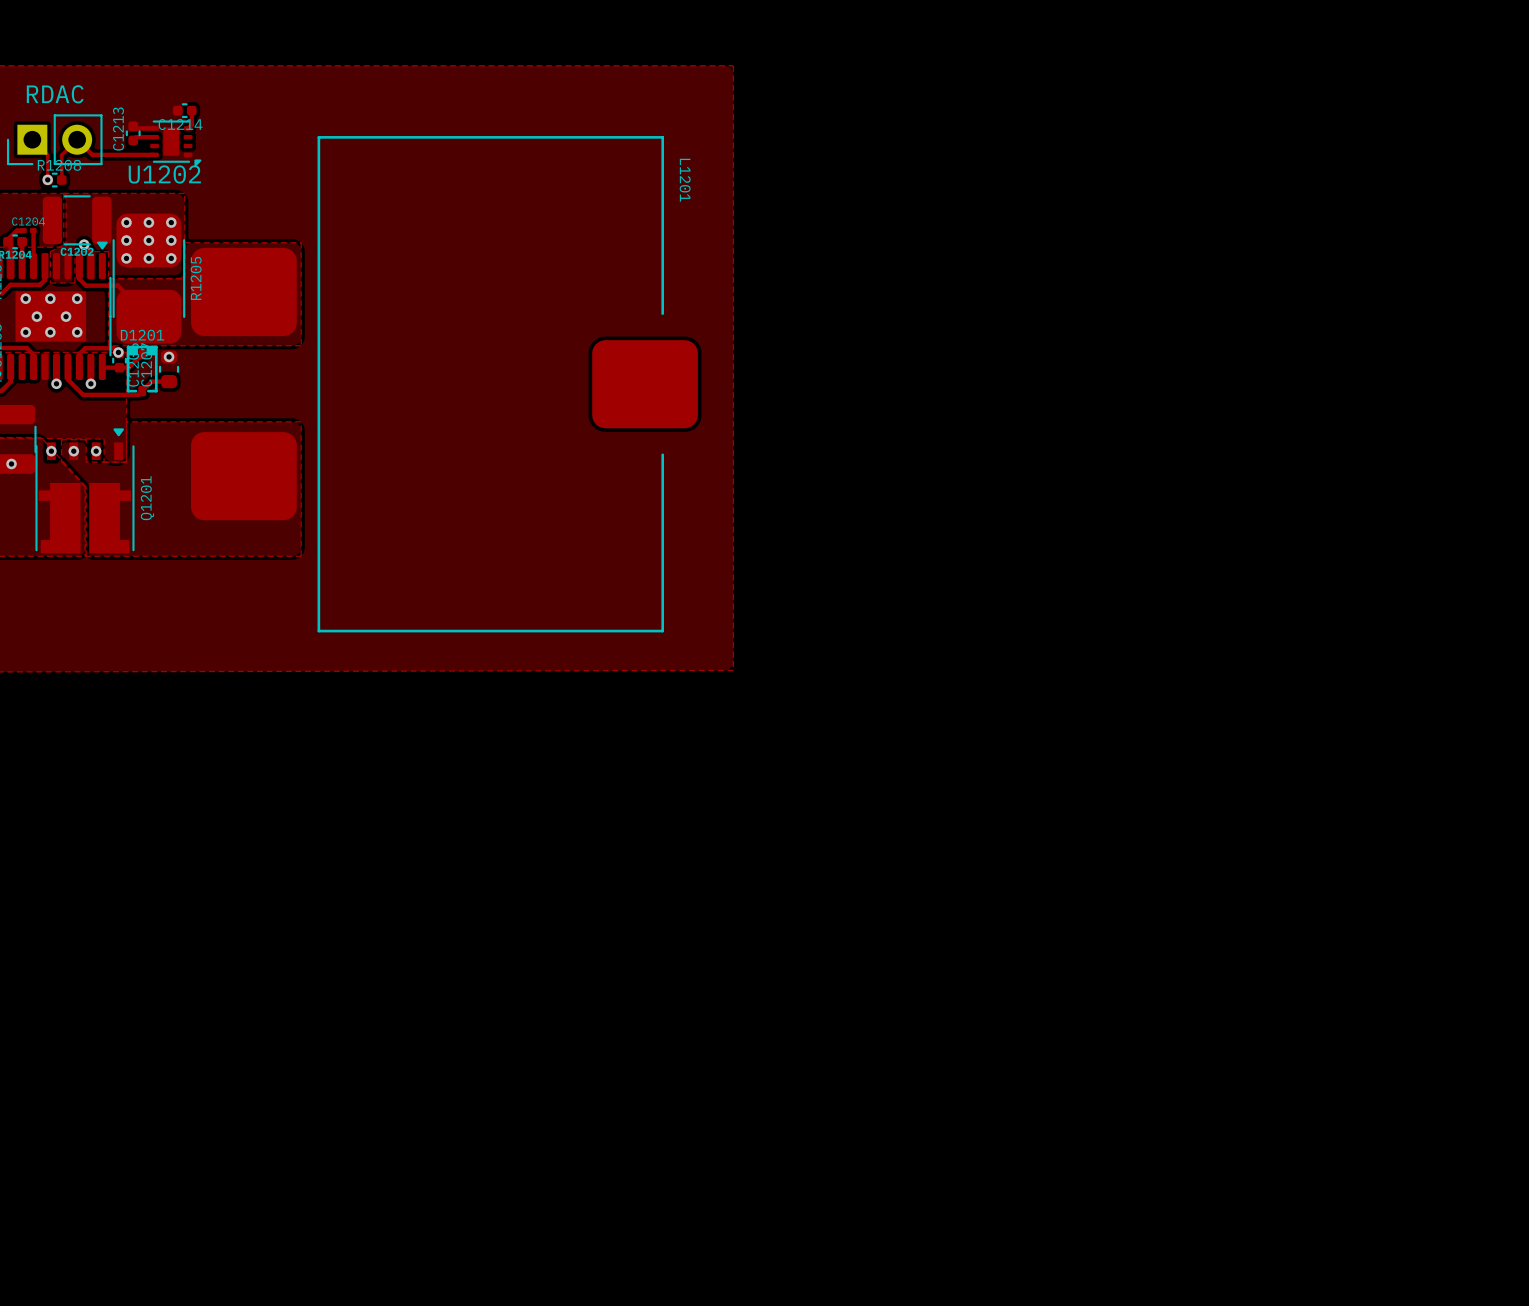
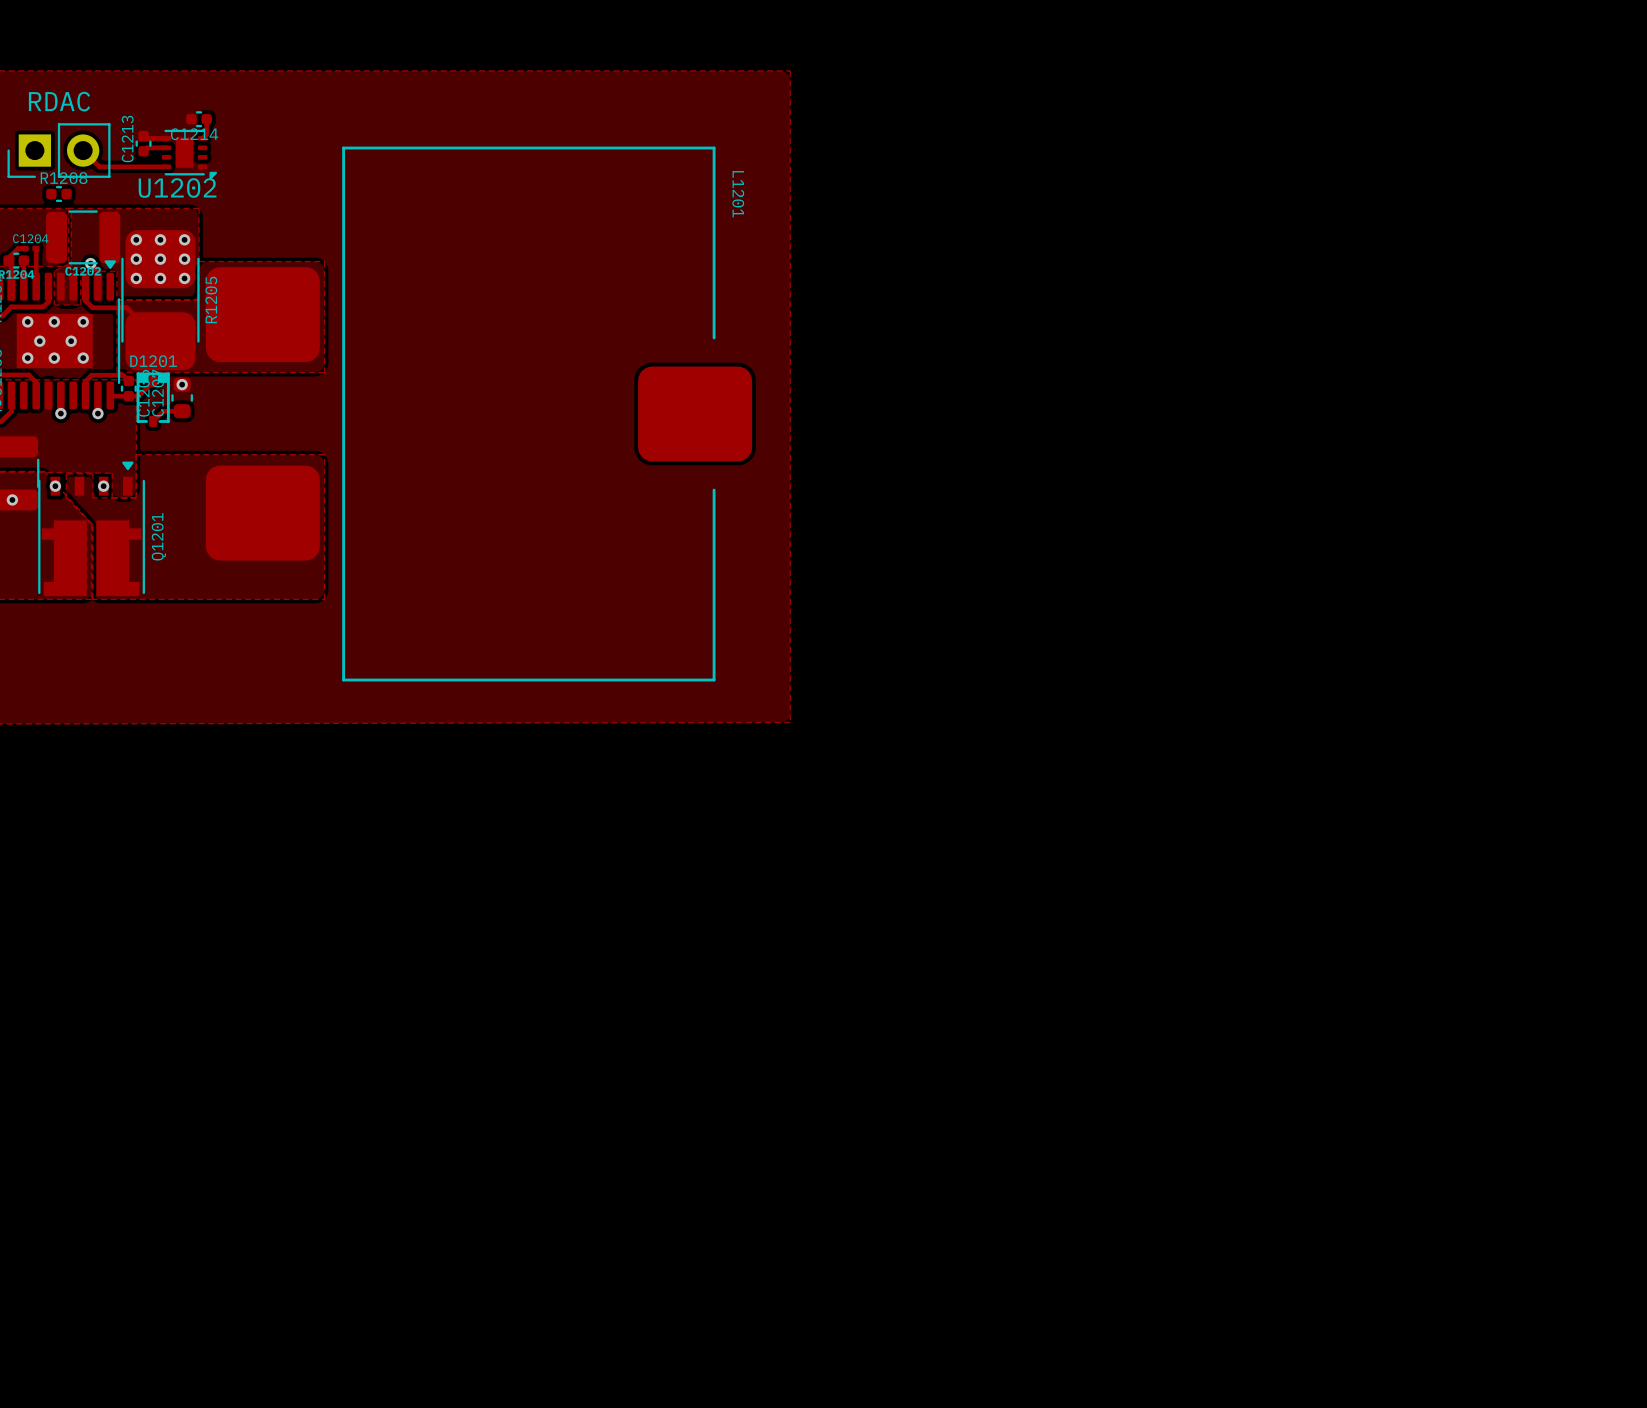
track: (32, 139) (47, 155) (47, 180) -> none
track: (77, 139) (61, 155) (61, 180) -> none
via: (47, 179) -> none
via: (118, 352) -> none
track: (67, 367) (67, 379) (83, 394) (138, 394) (142, 391) -> none
via: (73, 451) -> none

